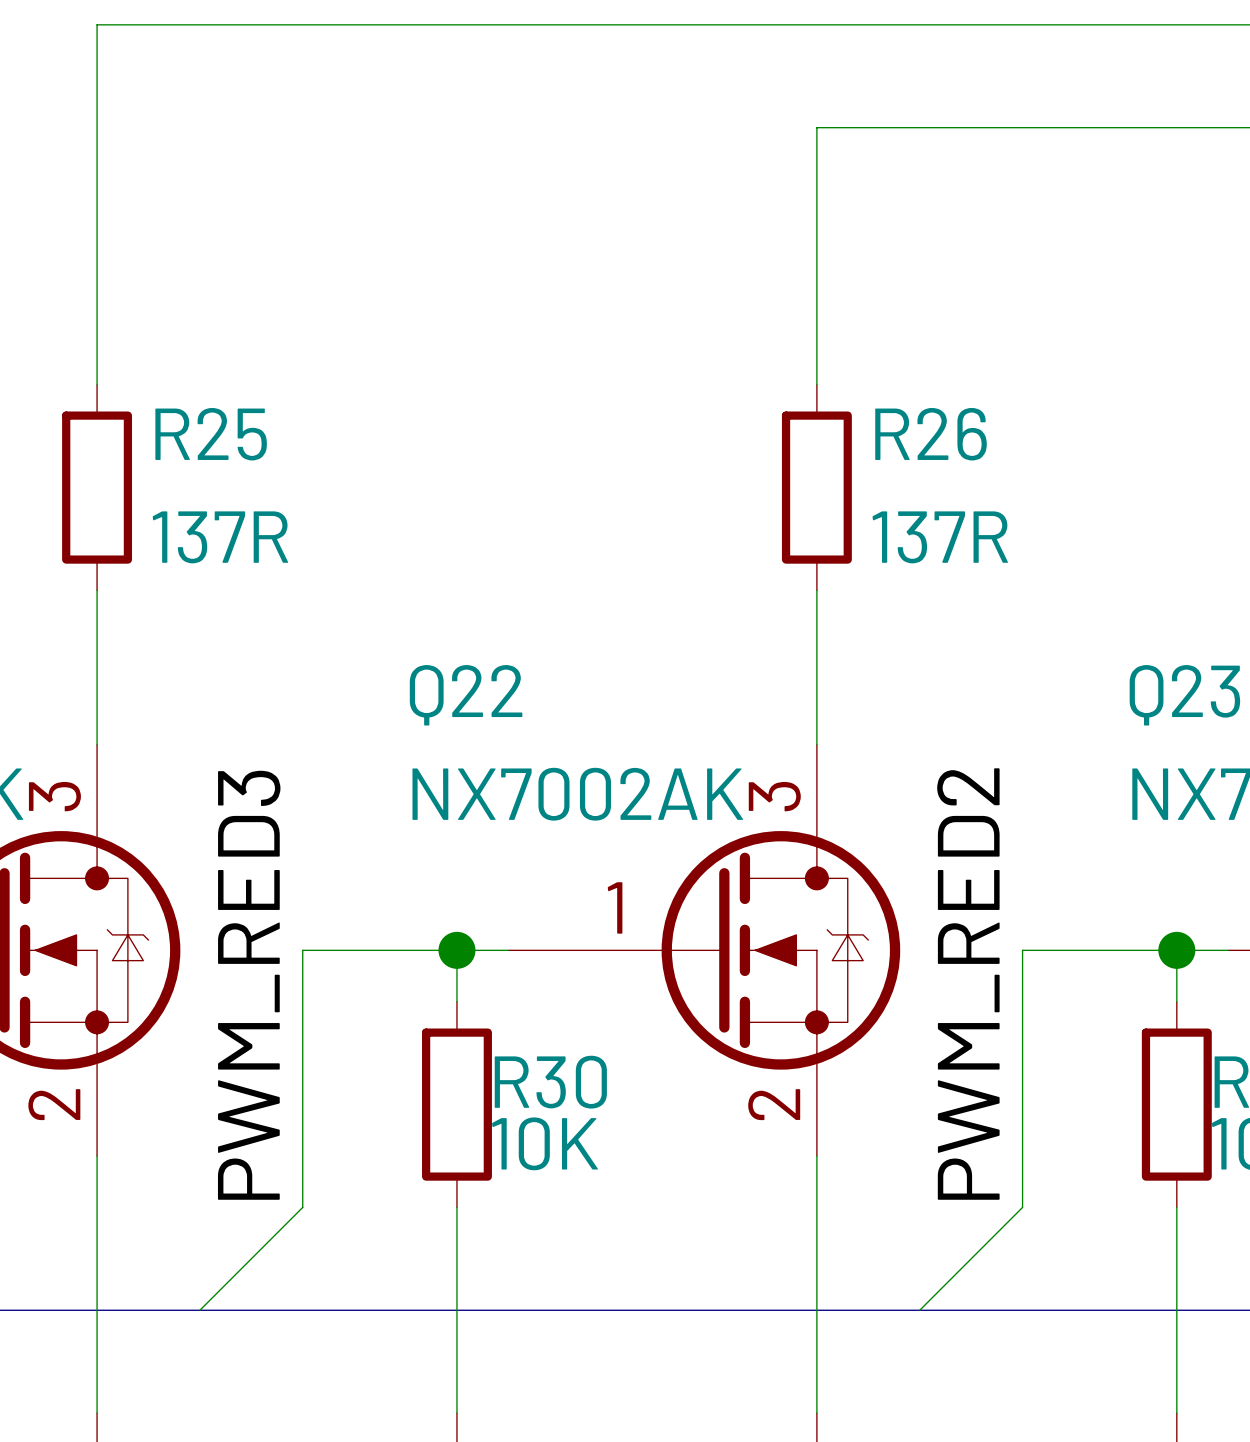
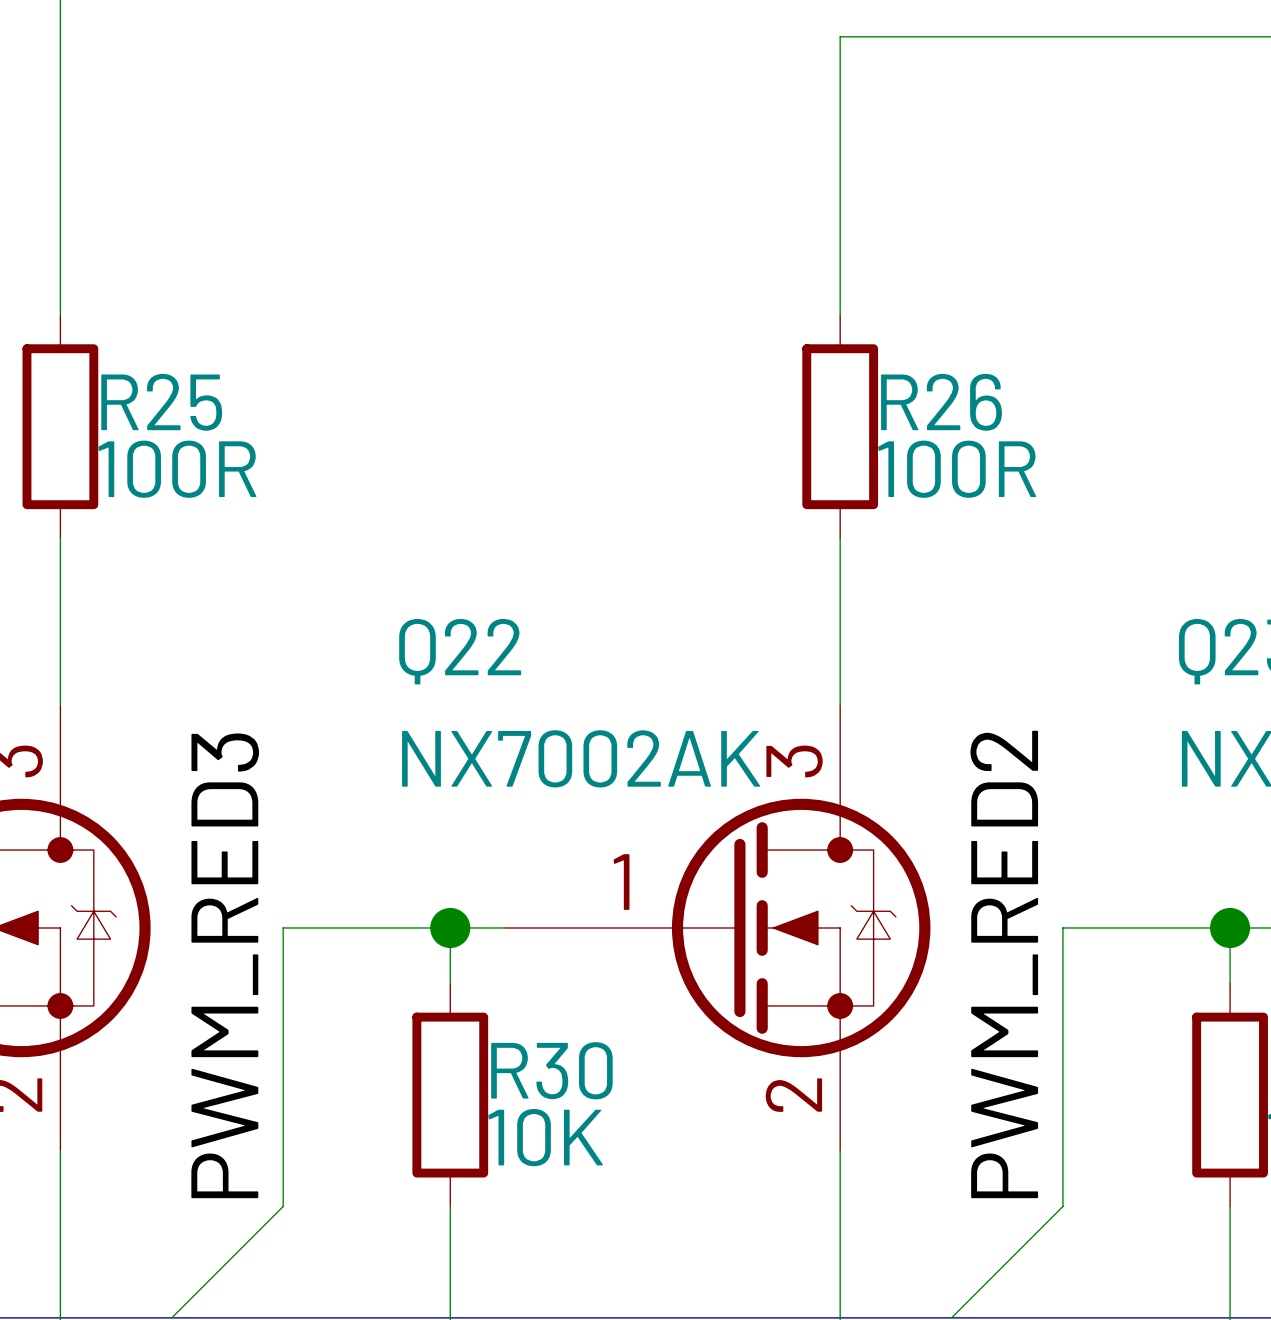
R25 name position: R25 (211, 434) -> R25 (161, 402)
R26 name position: R26 (931, 434) -> R26 (941, 402)
R25 value: 137R (220, 537) -> 100R (177, 469)
R26 value: 137R (940, 537) -> 100R (957, 469)

